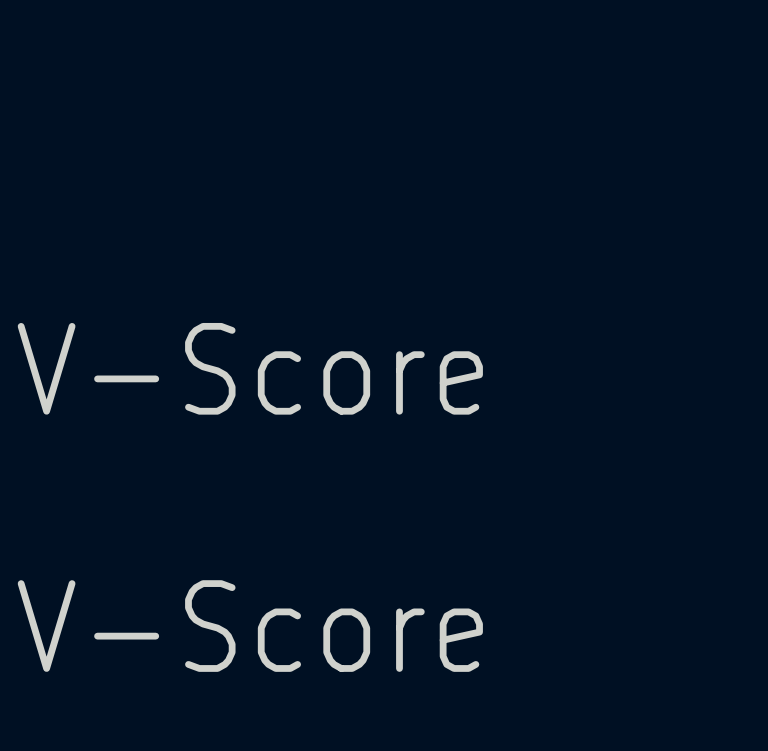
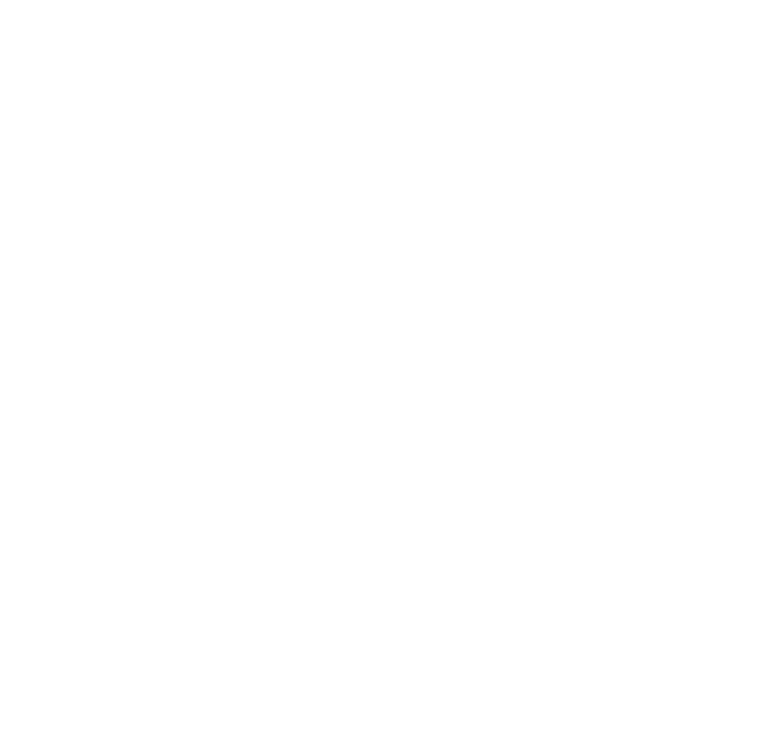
text: V-Score (250, 368) -> none
text: V-Score (250, 626) -> none

